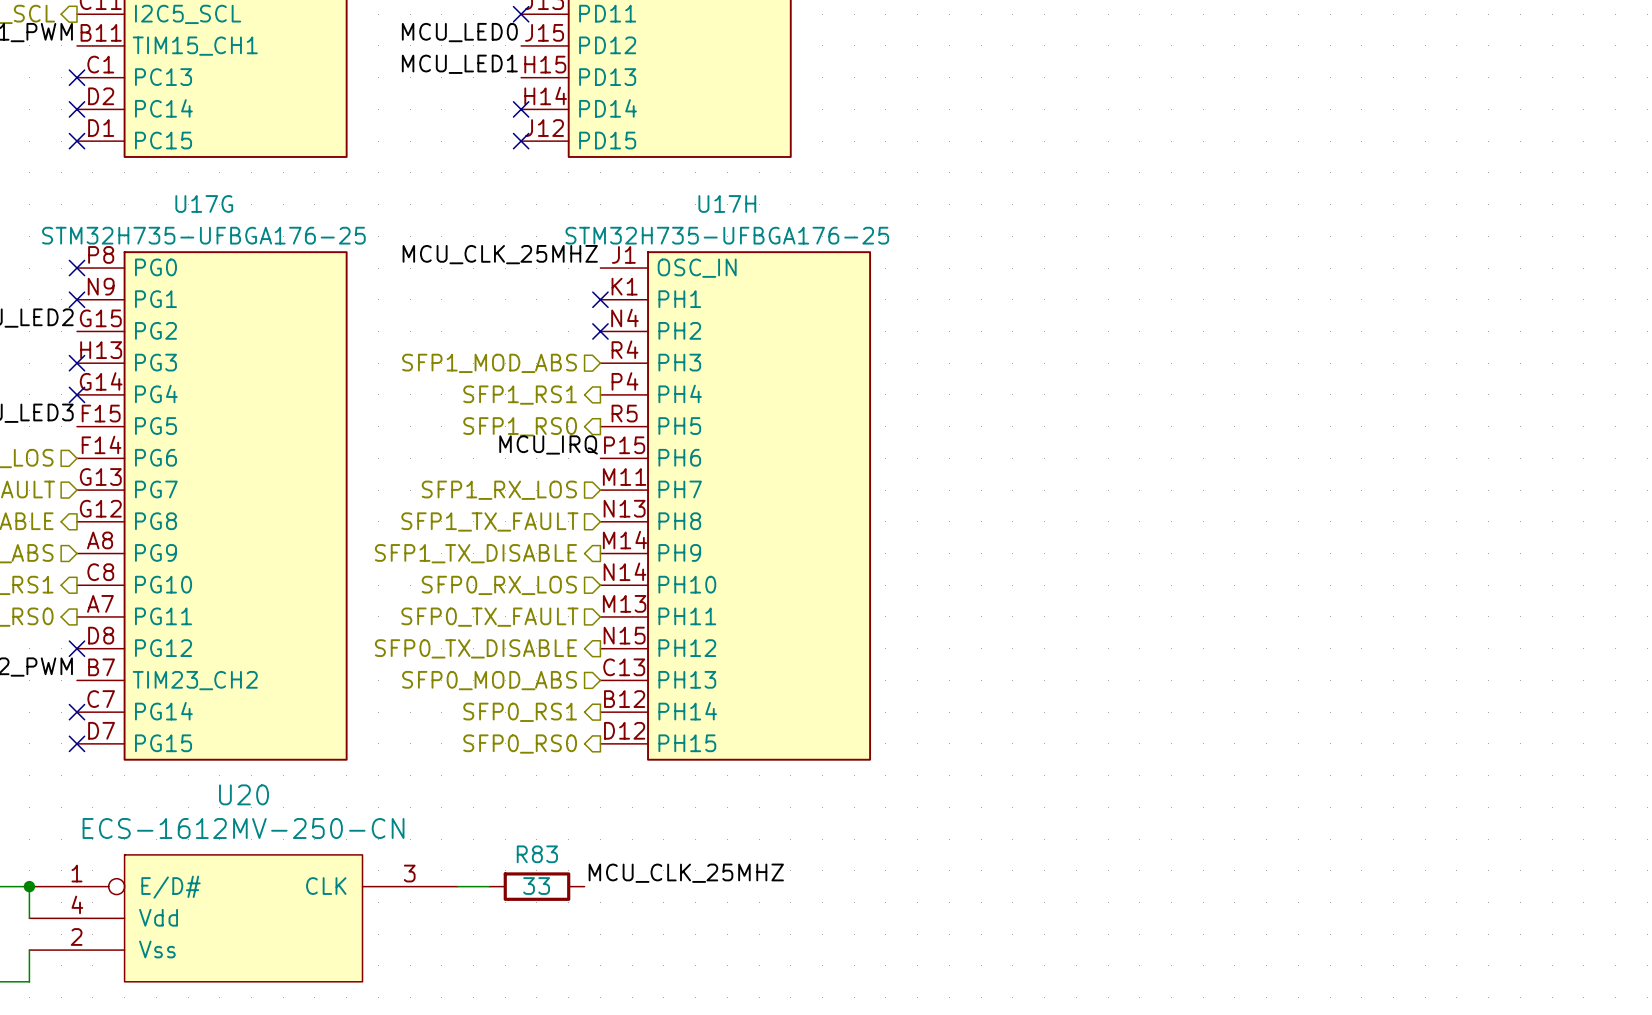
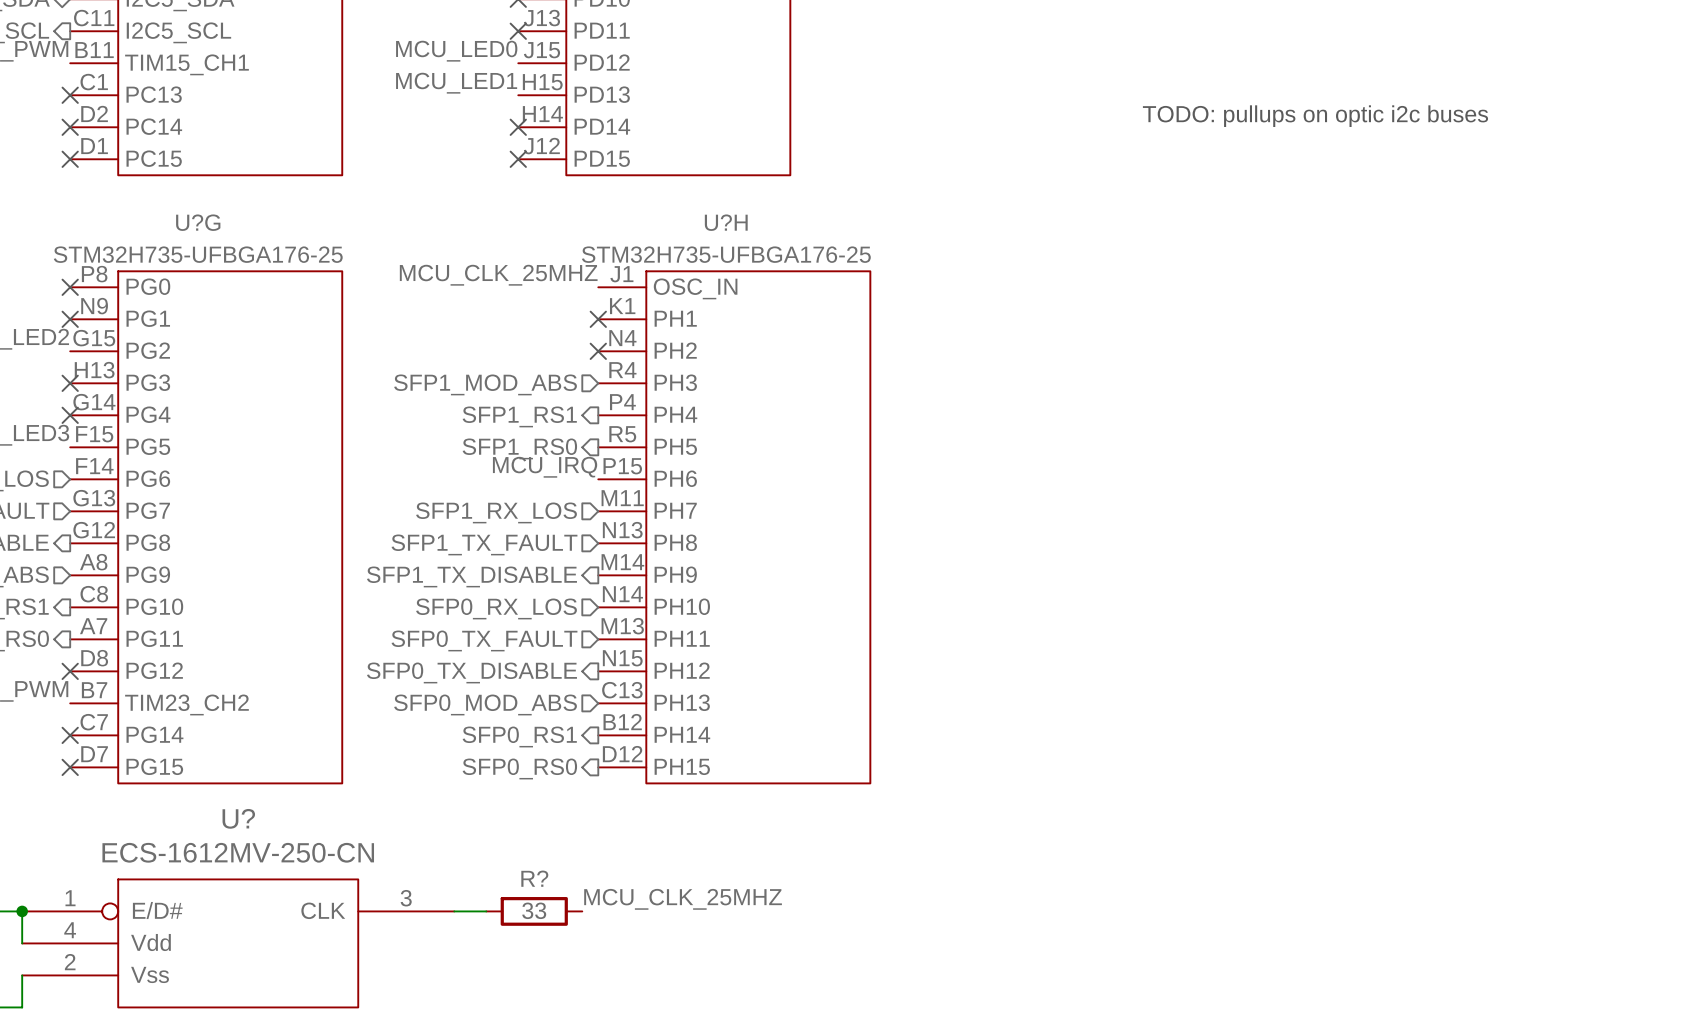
text: none -> TODO: pullups on optic i2c buses (1315, 116)
U17G name: U17G (204, 203) -> U?G (198, 222)
U17H name: U17H (727, 203) -> U?H (726, 222)
U20 name: U20 (244, 794) -> U? (238, 818)
R83 name: R83 (537, 854) -> R? (534, 878)

